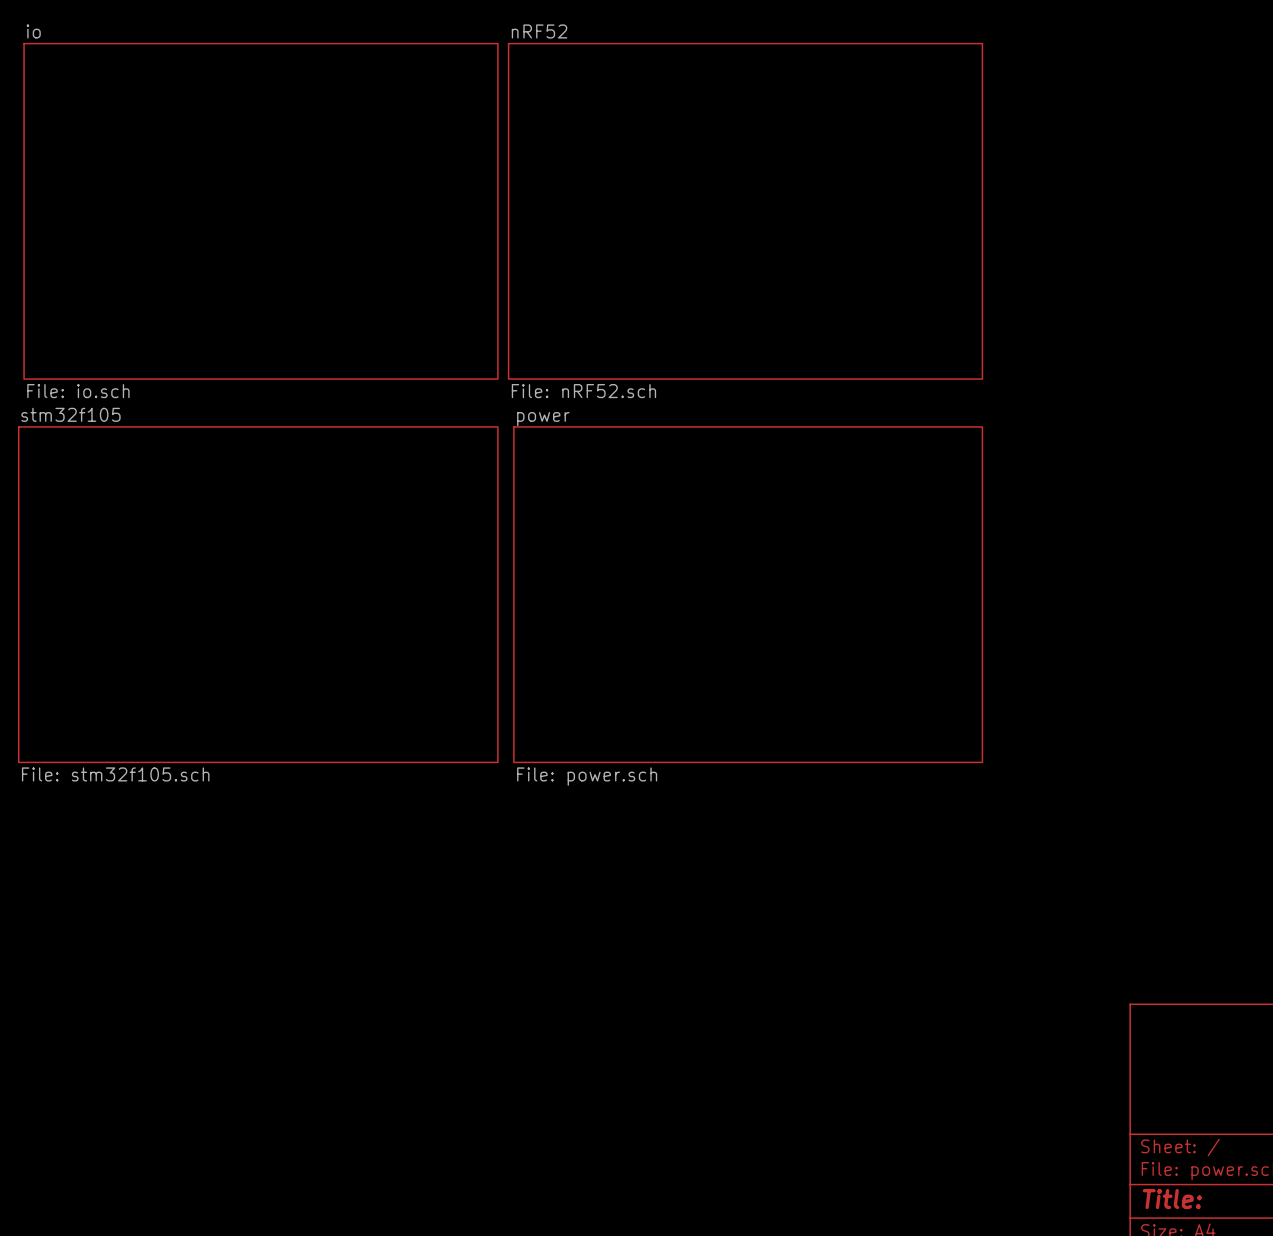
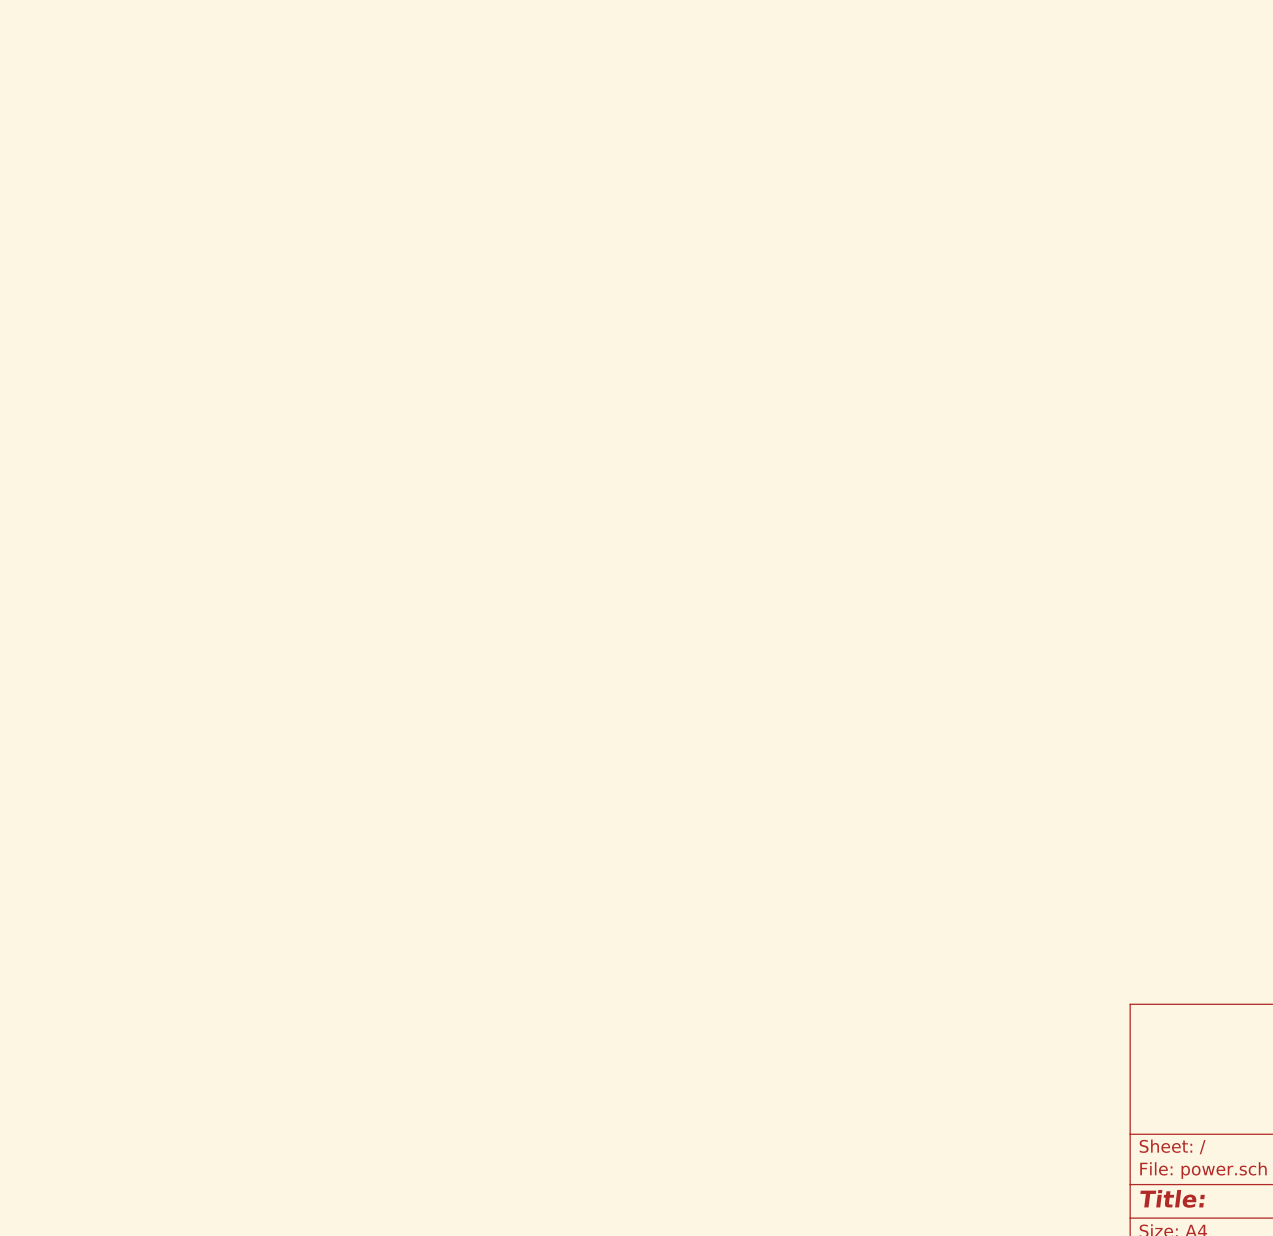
sheet io: File: io.sch (260, 211) -> none
sheet nRF52: File: nRF52.sch (745, 211) -> none
sheet stm32f105: File: stm32f105.sch (258, 594) -> none
sheet power: File: power.sch (748, 594) -> none

